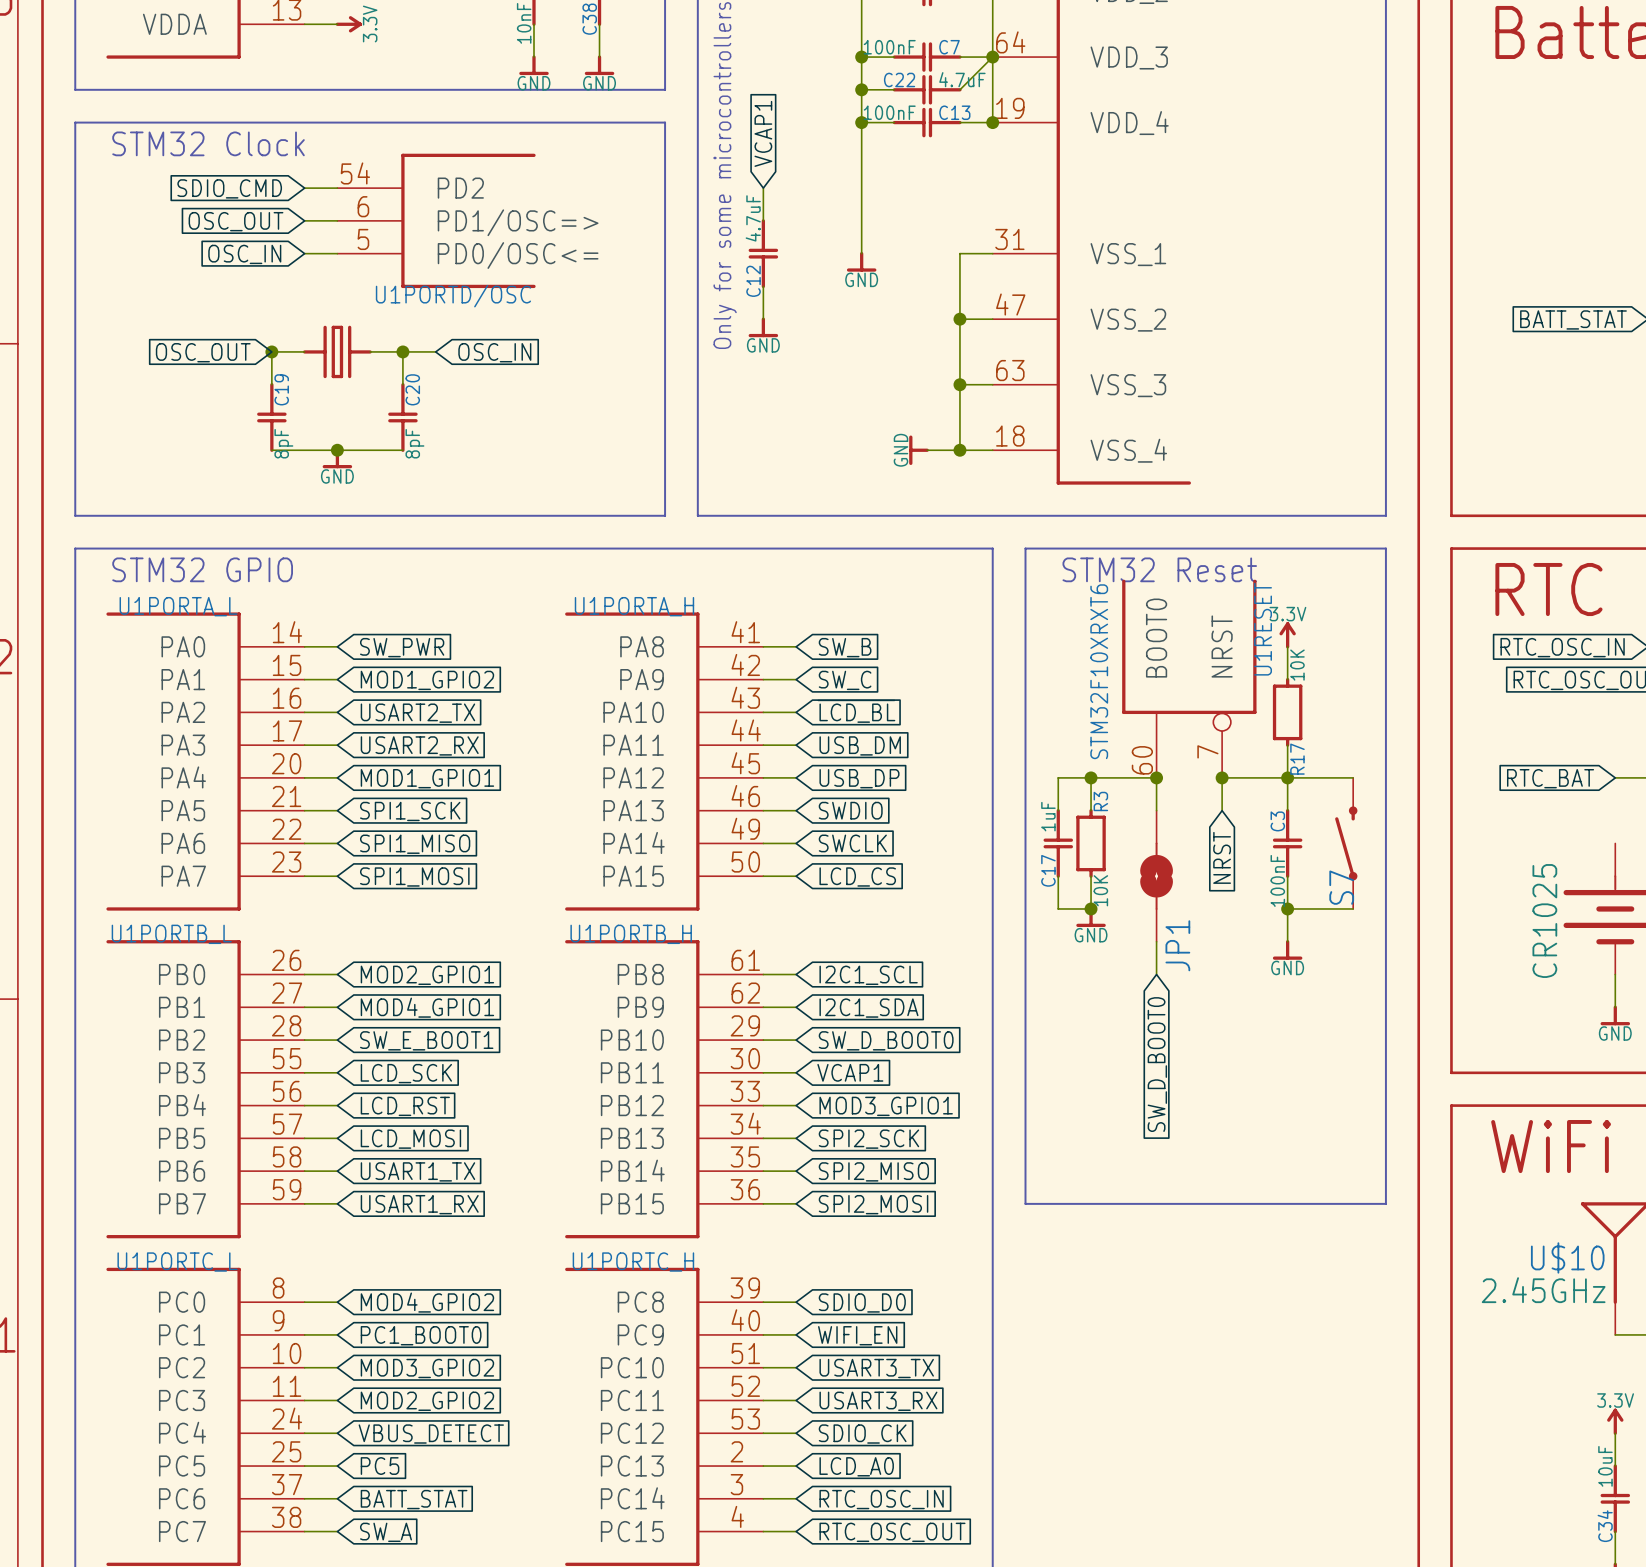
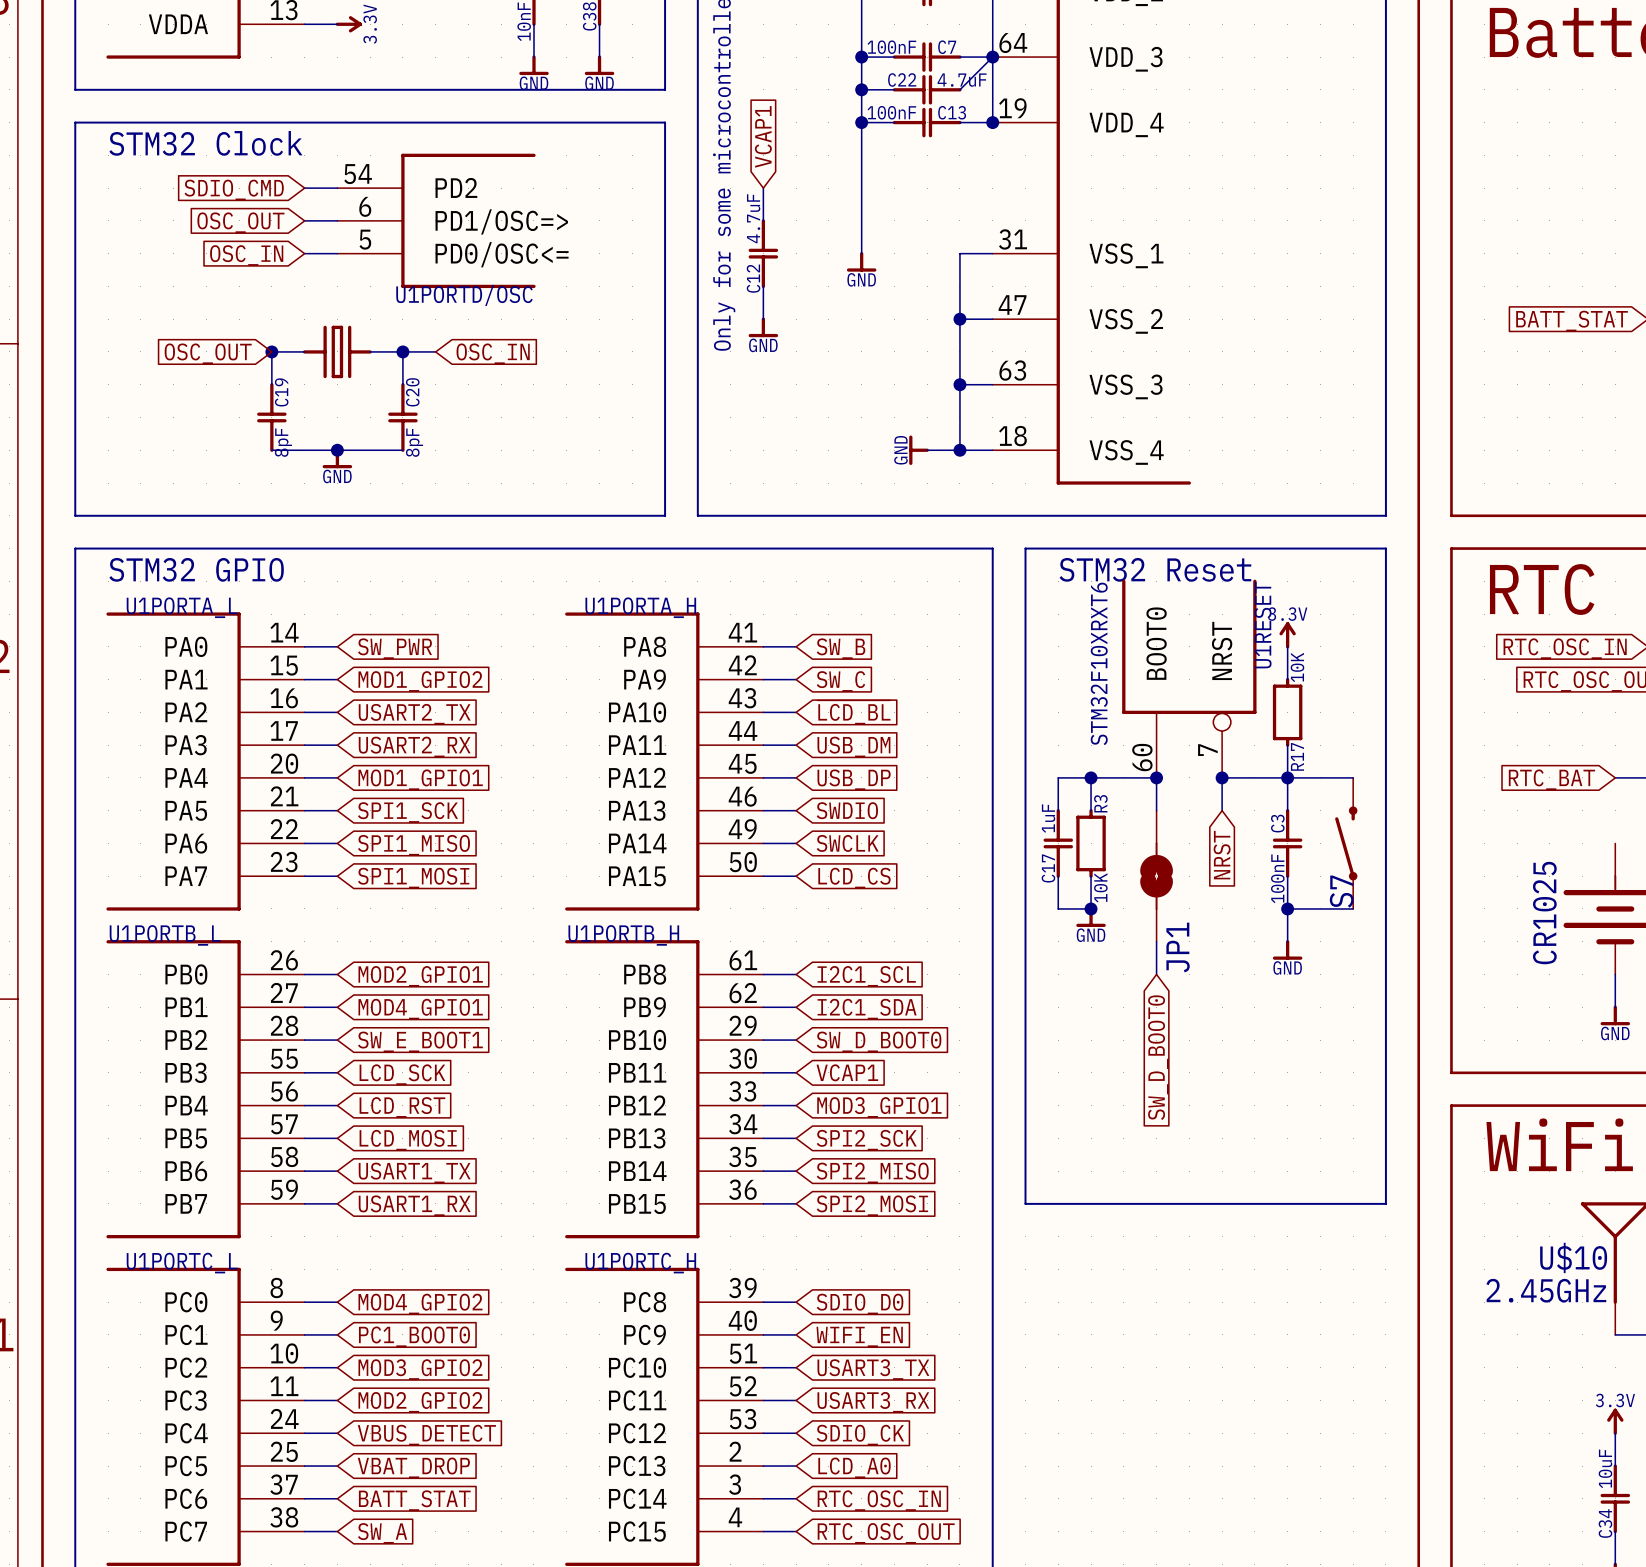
global label: PC5 (380, 1466) -> VBAT_DROP (413, 1467)

